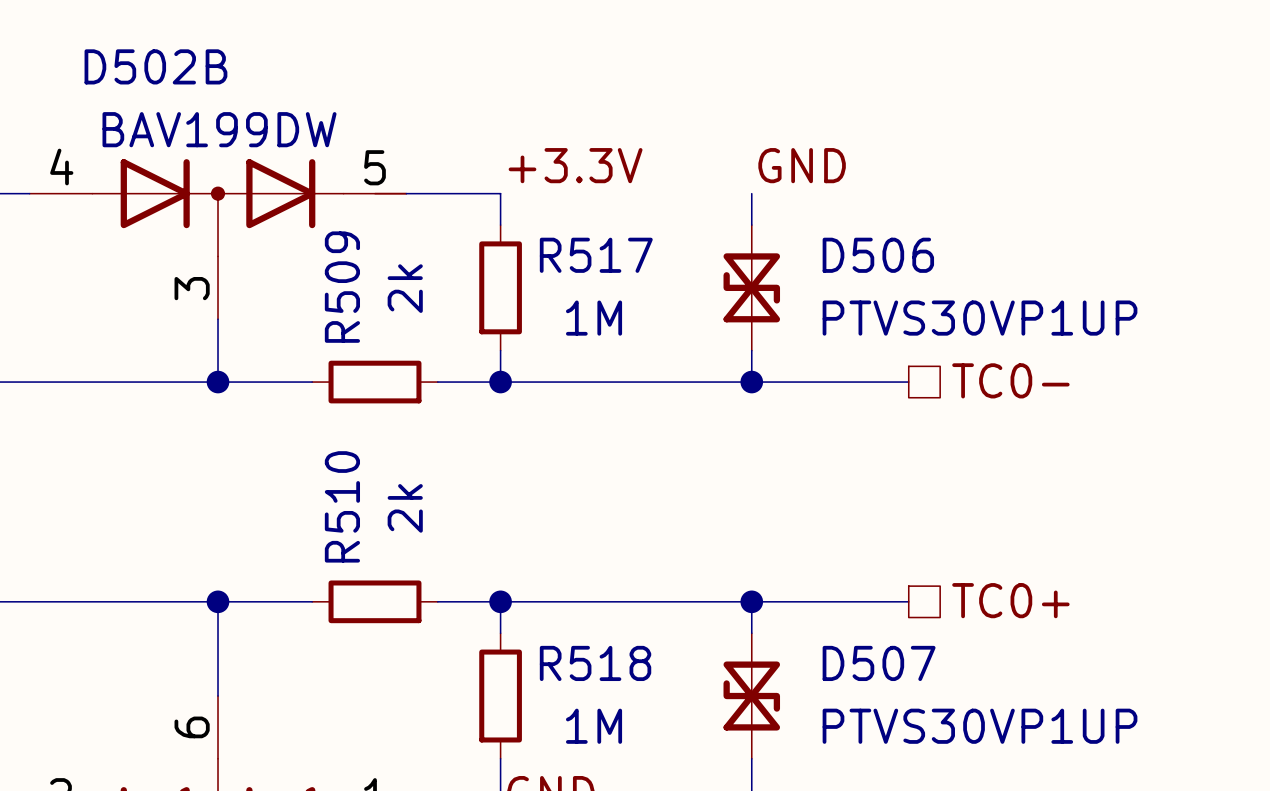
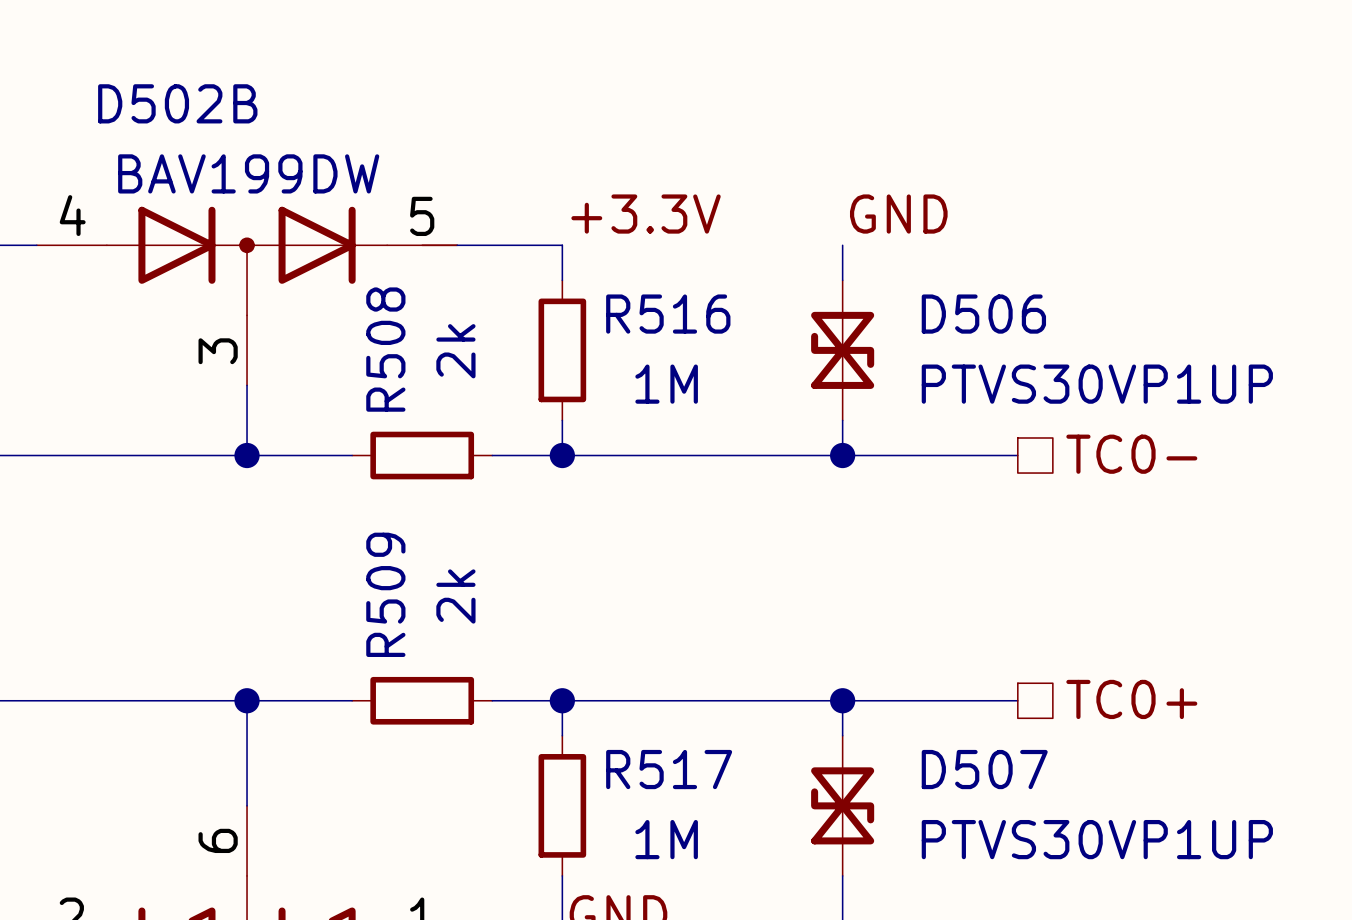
R517 name: R517 (596, 255) -> R516 (668, 314)
R509 name: R509 (342, 287) -> R508 (385, 349)
R510 name: R510 (342, 506) -> R509 (385, 594)
R518 name: R518 (595, 663) -> R517 (669, 769)

